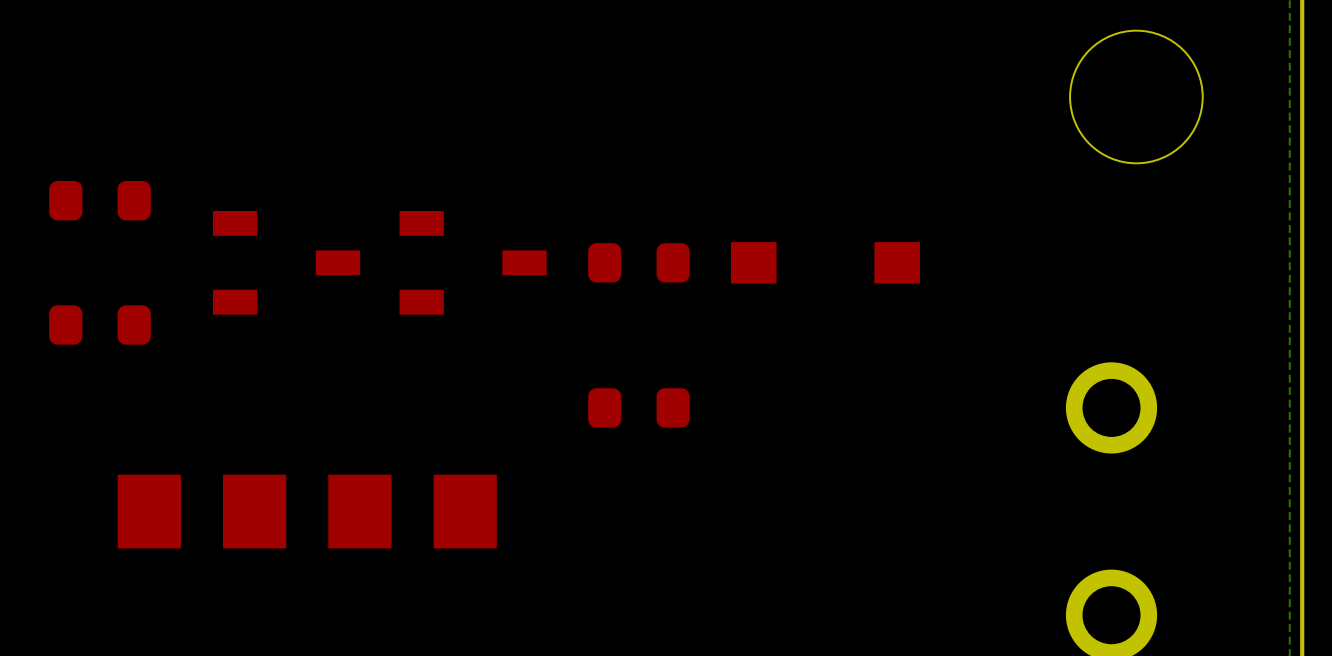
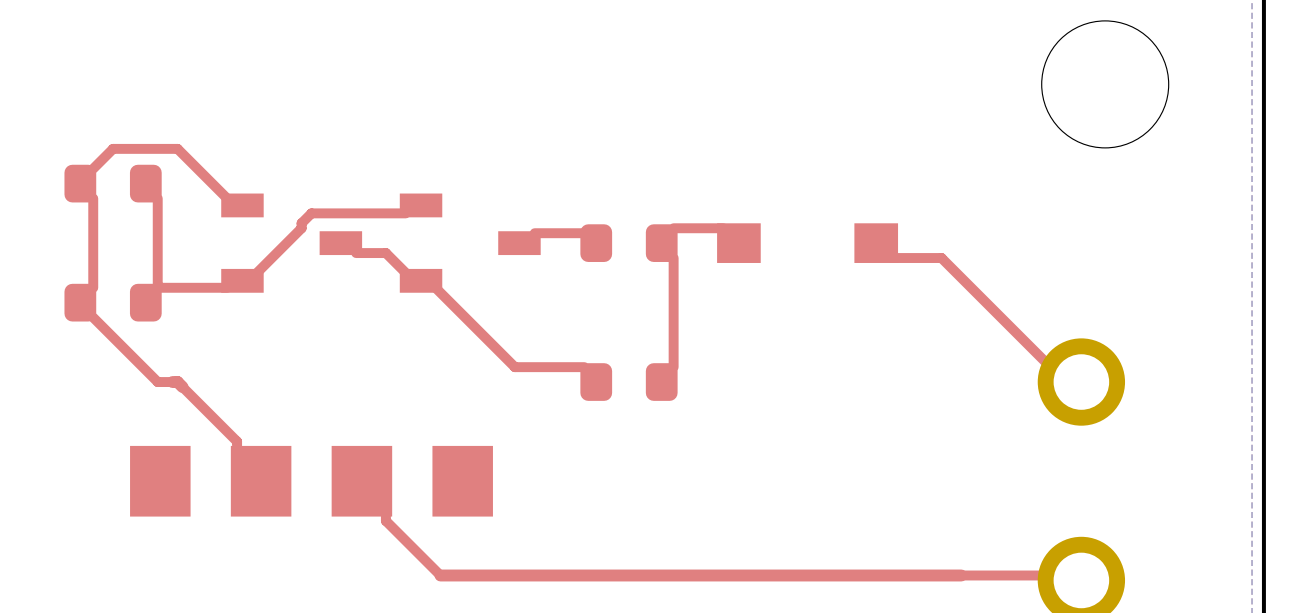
top track: none -> (93, 168) (113, 148) (177, 148) (227, 198)
top track: none -> (93, 198) (93, 287)
top track: none -> (157, 198) (157, 287) (227, 287)
top track: none -> (405, 213) (311, 213) (301, 223) (301, 228) (256, 272)
top track: none -> (723, 228) (673, 228)
top track: none -> (584, 233) (534, 233)
top track: none -> (356, 253) (385, 253) (405, 272)
top track: none -> (673, 258) (673, 367)
top track: none -> (891, 258) (941, 258) (1045, 362)
top track: none -> (435, 287) (514, 367) (584, 367)
top track: none -> (93, 317) (157, 382) (177, 382) (237, 441) (237, 451)
top track: none -> (385, 511) (385, 520) (440, 575) (1040, 575)

